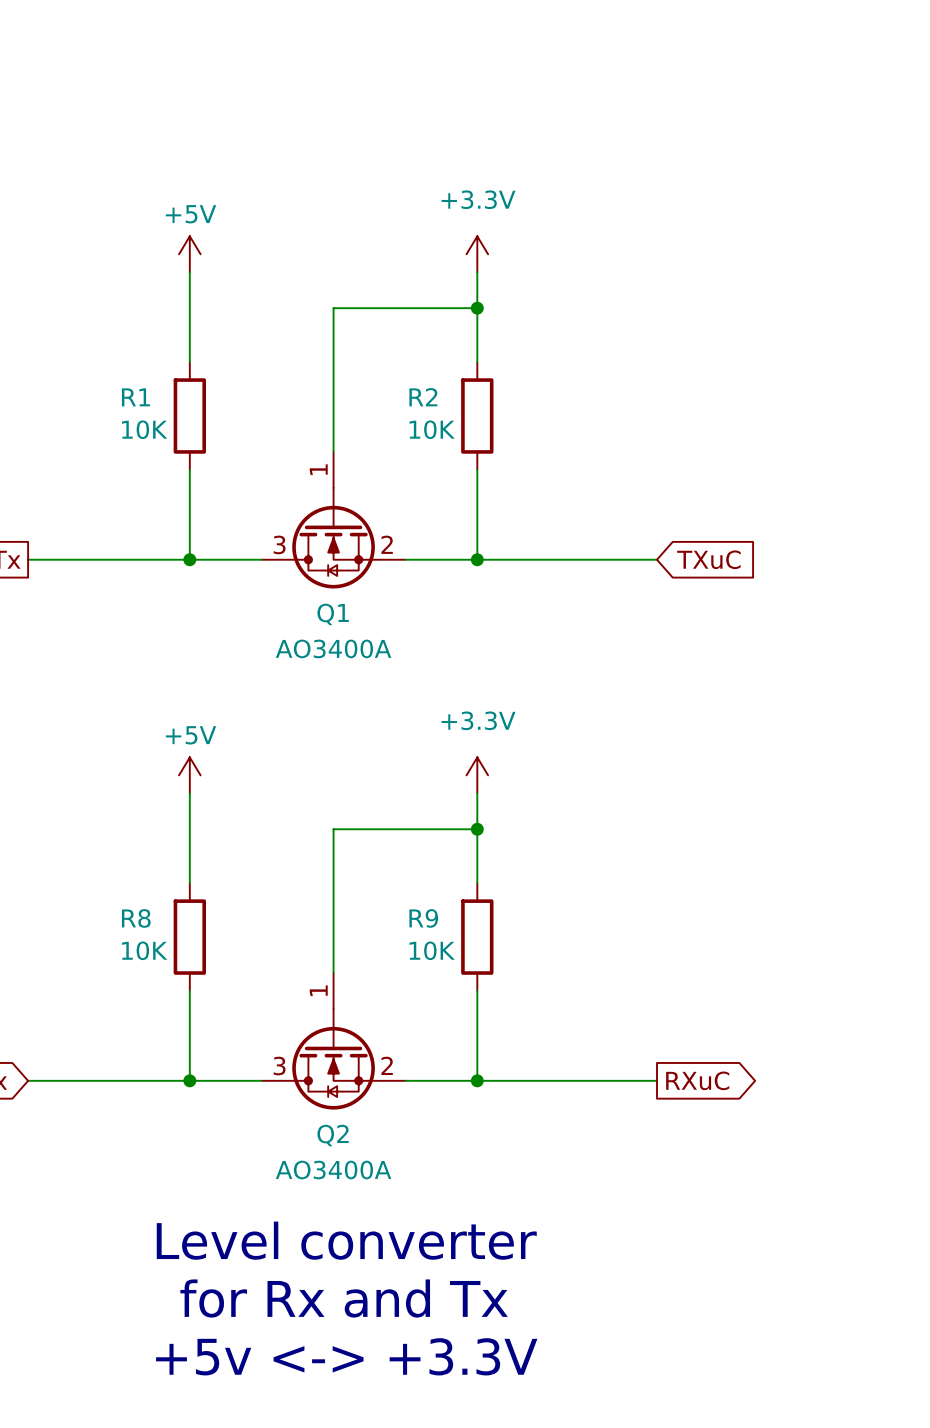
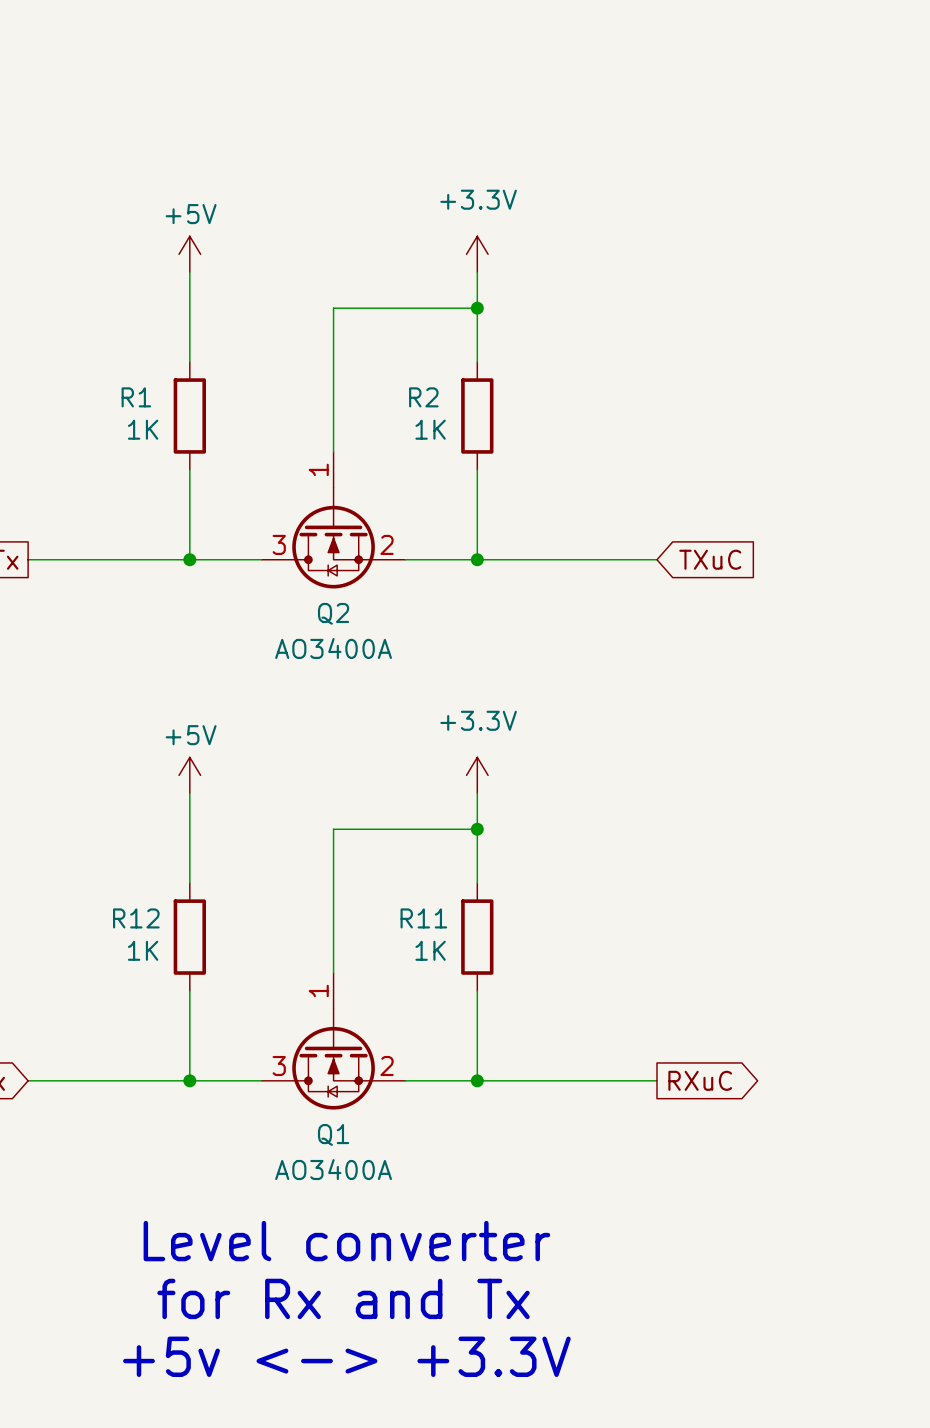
R1 value: 10K (144, 429) -> 1K (143, 429)
R2 value: 10K (432, 429) -> 1K (430, 429)
Q1 name: Q1 (333, 614) -> Q2 (333, 613)
R8 name: R8 (136, 918) -> R12 (136, 918)
R9 name: R9 (423, 918) -> R11 (423, 918)
R8 value: 10K (144, 950) -> 1K (143, 950)
R9 value: 10K (432, 950) -> 1K (430, 950)
Q2 name: Q2 (333, 1135) -> Q1 (333, 1134)

